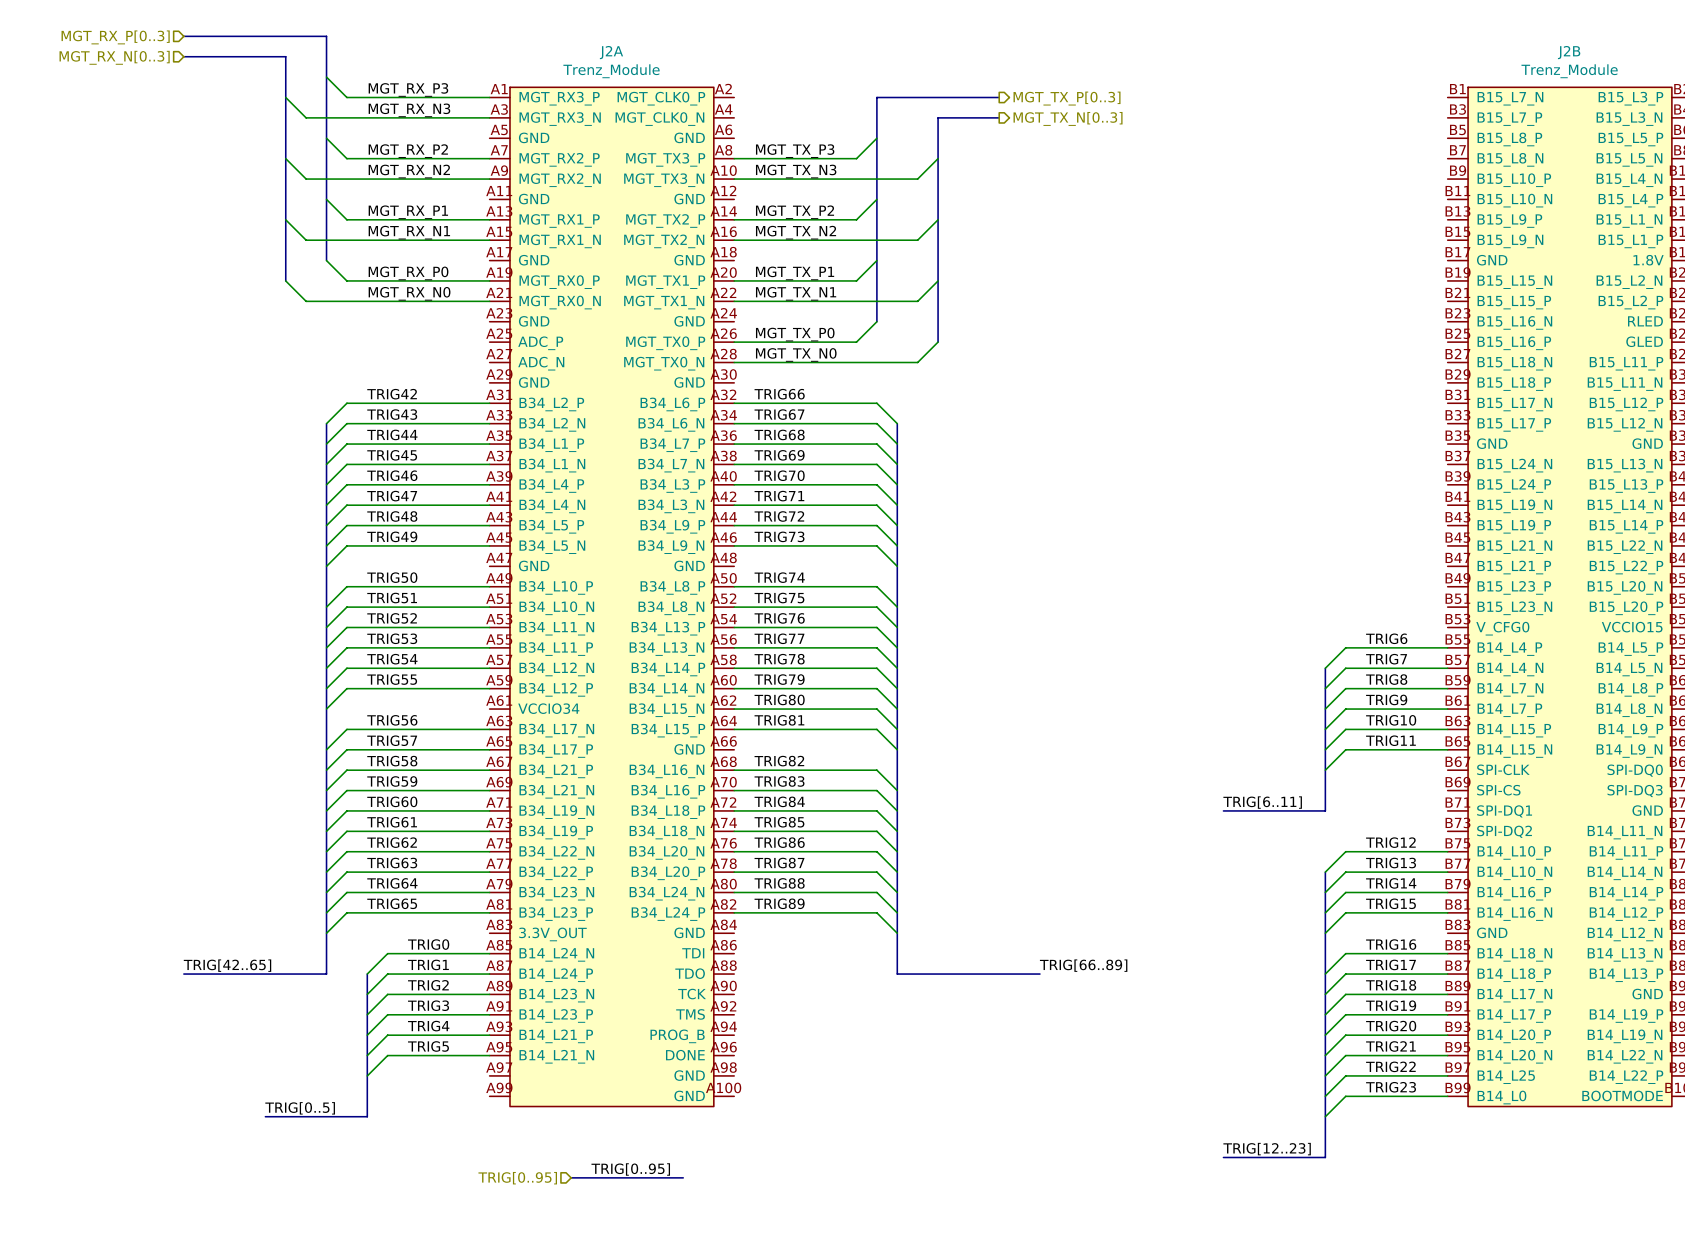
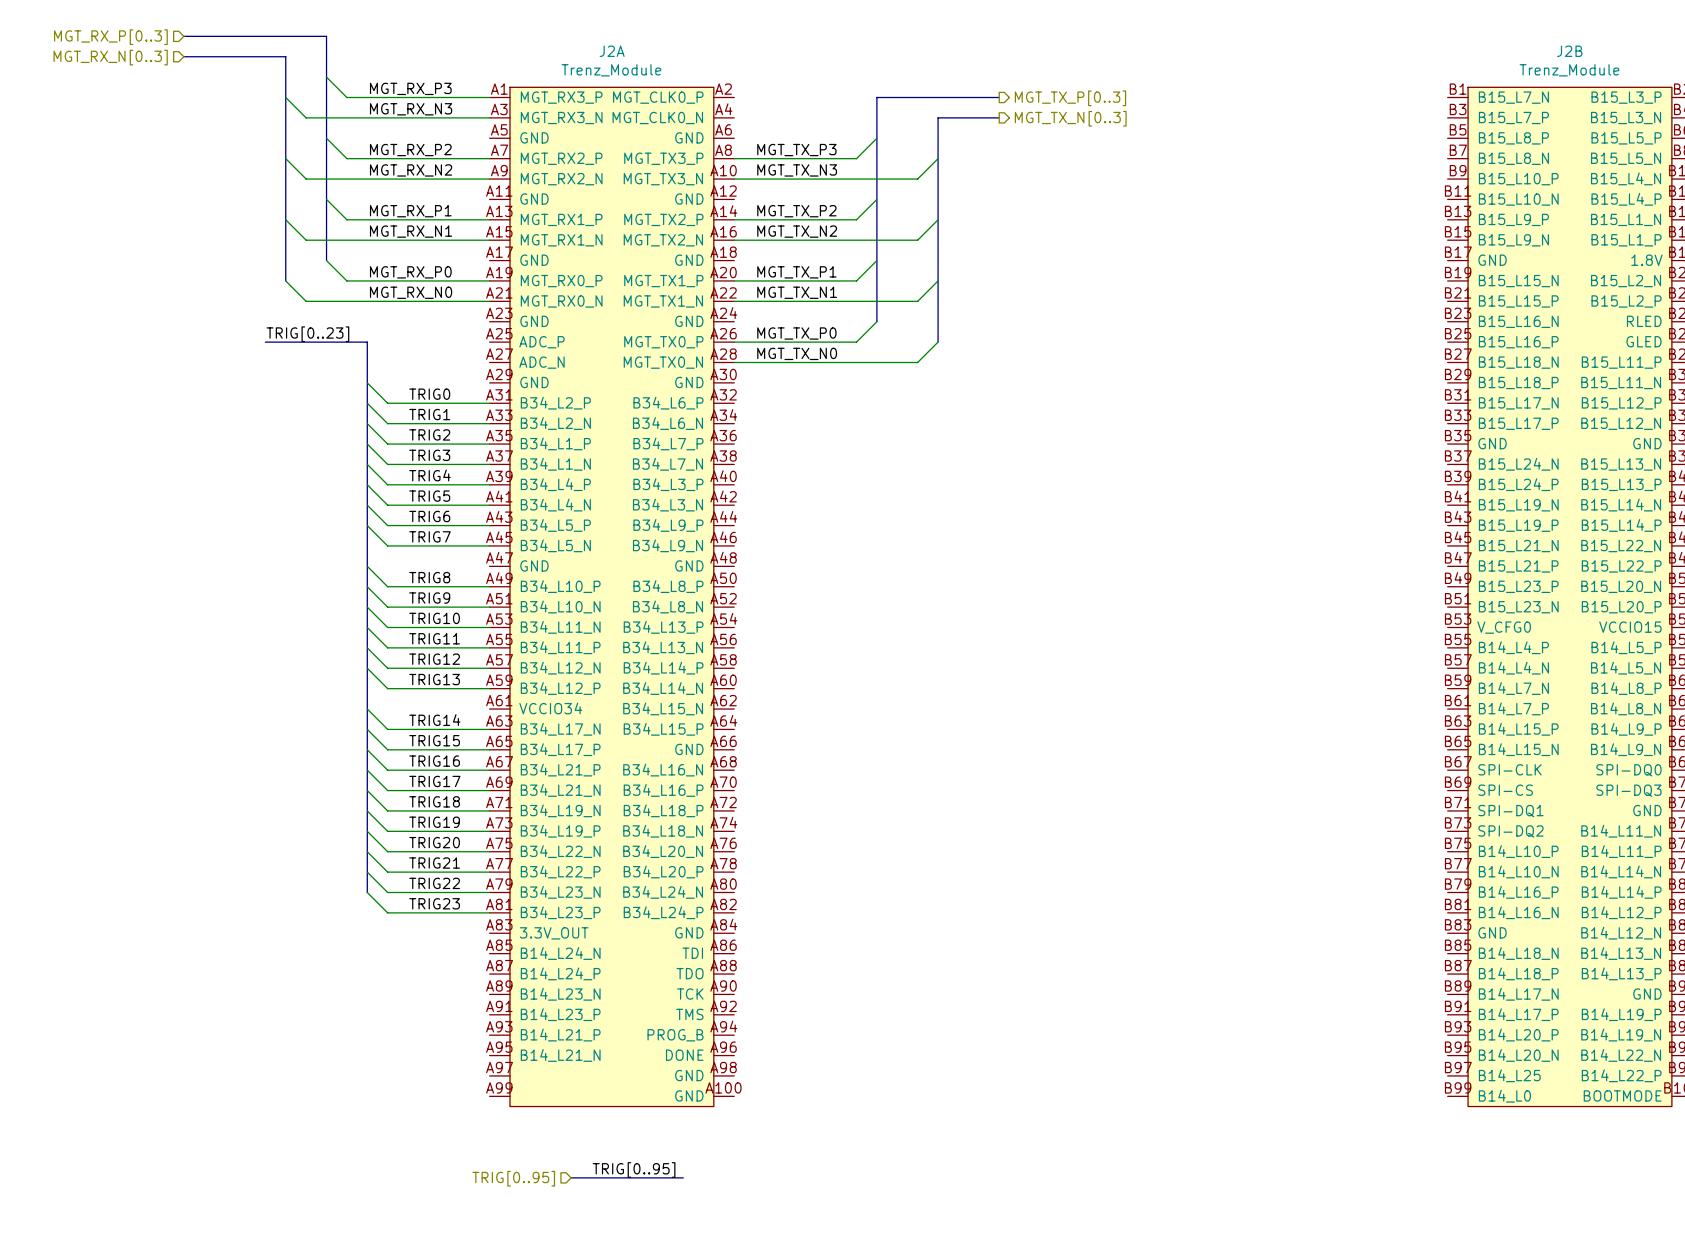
label: none -> TRIG[0..23] (307, 334)
bus: none -> (265, 342) (367, 342) (367, 892)
label: TRIG42 (392, 394) -> none
label: none -> TRIG0 (429, 394)
label: TRIG66 (779, 394) -> none
wire: (387, 403) (346, 403) (326, 423) -> (387, 403) (367, 382)
wire: (734, 403) (876, 403) (897, 423) -> none
label: TRIG43 (392, 414) -> none
label: none -> TRIG1 (429, 414)
label: TRIG67 (779, 414) -> none
bus: (326, 423) (326, 974) (183, 974) -> none
wire: (387, 423) (346, 423) (326, 444) -> (387, 423) (367, 403)
wire: (734, 423) (876, 423) (897, 444) -> none
bus: (897, 423) (897, 974) (1039, 974) -> none
label: TRIG44 (392, 434) -> none
label: none -> TRIG2 (429, 434)
label: TRIG68 (779, 434) -> none
wire: (387, 444) (346, 444) (326, 464) -> (387, 444) (367, 423)
wire: (734, 444) (876, 444) (897, 464) -> none
label: TRIG45 (392, 455) -> none
label: none -> TRIG3 (429, 455)
label: TRIG69 (779, 455) -> none
wire: (387, 464) (346, 464) (326, 484) -> (387, 464) (367, 444)
wire: (734, 464) (876, 464) (897, 484) -> none
label: TRIG46 (392, 475) -> none
label: none -> TRIG4 (429, 475)
label: TRIG70 (779, 475) -> none
wire: (387, 484) (346, 484) (326, 505) -> (387, 484) (367, 464)
wire: (734, 484) (876, 484) (897, 505) -> none
label: TRIG47 (392, 496) -> none
label: none -> TRIG5 (429, 496)
label: TRIG71 (779, 496) -> none
wire: (387, 505) (346, 505) (326, 525) -> (387, 505) (367, 484)
wire: (734, 505) (876, 505) (897, 525) -> none
label: TRIG48 (392, 516) -> none
label: none -> TRIG6 (429, 516)
label: TRIG72 (779, 516) -> none
wire: (387, 525) (346, 525) (326, 545) -> (387, 525) (367, 505)
wire: (734, 525) (876, 525) (897, 545) -> none
label: TRIG49 (392, 536) -> none
label: none -> TRIG7 (429, 536)
label: TRIG73 (779, 536) -> none
wire: (387, 545) (346, 545) (326, 566) -> (387, 545) (367, 525)
wire: (734, 545) (876, 545) (897, 566) -> none
label: TRIG50 (392, 577) -> none
label: none -> TRIG8 (429, 577)
label: TRIG74 (779, 577) -> none
wire: (387, 586) (346, 586) (326, 607) -> (387, 586) (367, 566)
wire: (734, 586) (876, 586) (897, 607) -> none
label: TRIG51 (392, 598) -> none
label: none -> TRIG9 (429, 598)
label: TRIG75 (779, 598) -> none
wire: (387, 607) (346, 607) (326, 627) -> (387, 607) (367, 586)
wire: (734, 607) (876, 607) (897, 627) -> none
label: TRIG52 (392, 618) -> none
label: none -> TRIG10 (434, 618)
label: TRIG76 (779, 618) -> none
wire: (387, 627) (346, 627) (326, 647) -> (387, 627) (367, 607)
wire: (734, 627) (876, 627) (897, 647) -> none
label: TRIG53 (392, 638) -> none
label: none -> TRIG11 (434, 638)
label: TRIG77 (779, 638) -> none
label: TRIG6 (1386, 638) -> none
wire: (387, 647) (346, 647) (326, 668) -> (387, 647) (367, 627)
wire: (734, 647) (876, 647) (897, 668) -> none
wire: (1447, 647) (1345, 647) (1325, 668) -> none
label: TRIG54 (392, 659) -> none
label: none -> TRIG12 (434, 659)
label: TRIG78 (779, 659) -> none
label: TRIG7 (1386, 659) -> none
wire: (387, 668) (346, 668) (326, 688) -> (387, 668) (367, 647)
wire: (734, 668) (876, 668) (897, 688) -> none
bus: (1325, 668) (1325, 810) (1223, 810) -> none
wire: (1447, 668) (1345, 668) (1325, 688) -> none
label: TRIG55 (392, 679) -> none
label: none -> TRIG13 (434, 679)
label: TRIG79 (779, 679) -> none
label: TRIG8 (1386, 679) -> none
wire: (387, 688) (346, 688) (326, 709) -> (387, 688) (367, 668)
wire: (734, 688) (876, 688) (897, 709) -> none
wire: (1447, 688) (1345, 688) (1325, 709) -> none
label: TRIG80 (779, 699) -> none
label: TRIG9 (1386, 699) -> none
wire: (734, 709) (876, 709) (897, 729) -> none
wire: (1447, 709) (1345, 709) (1325, 729) -> none
label: TRIG56 (392, 720) -> none
label: none -> TRIG14 (434, 720)
label: TRIG81 (779, 720) -> none
label: TRIG10 (1391, 720) -> none
wire: (387, 729) (346, 729) (326, 749) -> (387, 729) (367, 709)
wire: (734, 729) (876, 729) (897, 749) -> none
wire: (1447, 729) (1345, 729) (1325, 749) -> none
label: TRIG57 (392, 740) -> none
label: none -> TRIG15 (434, 740)
label: TRIG11 (1390, 740) -> none
wire: (387, 749) (346, 749) (326, 770) -> (387, 749) (367, 729)
wire: (1447, 749) (1345, 749) (1325, 770) -> none
label: TRIG58 (392, 761) -> none
label: none -> TRIG16 (434, 761)
label: TRIG82 (779, 761) -> none
wire: (387, 770) (346, 770) (326, 790) -> (387, 770) (367, 749)
wire: (734, 770) (876, 770) (897, 790) -> none
label: TRIG59 (392, 781) -> none
label: none -> TRIG17 (434, 781)
label: TRIG83 (779, 781) -> none
wire: (387, 790) (346, 790) (326, 810) -> (387, 790) (367, 770)
wire: (734, 790) (876, 790) (897, 810) -> none
label: TRIG60 (392, 801) -> none
label: none -> TRIG18 (434, 801)
label: TRIG84 (779, 801) -> none
label: TRIG[6..11] (1262, 802) -> none
wire: (387, 810) (346, 810) (326, 831) -> (387, 810) (367, 790)
wire: (734, 810) (876, 810) (897, 831) -> none
label: TRIG61 (392, 822) -> none
label: none -> TRIG19 (434, 822)
label: TRIG85 (779, 822) -> none
wire: (387, 831) (346, 831) (326, 851) -> (387, 831) (367, 810)
wire: (734, 831) (876, 831) (897, 851) -> none
label: TRIG62 (392, 842) -> none
label: none -> TRIG20 (434, 842)
label: TRIG86 (779, 842) -> none
label: TRIG12 (1390, 842) -> none
wire: (387, 851) (346, 851) (326, 872) -> (387, 851) (367, 831)
wire: (734, 851) (876, 851) (897, 872) -> none
wire: (1447, 851) (1345, 851) (1325, 872) -> none
label: TRIG63 (392, 863) -> none
label: none -> TRIG21 (434, 863)
label: TRIG87 (779, 863) -> none
label: TRIG13 (1391, 863) -> none
wire: (387, 872) (346, 872) (326, 892) -> (387, 872) (367, 851)
wire: (734, 872) (876, 872) (897, 892) -> none
bus: (1325, 872) (1325, 1157) (1223, 1157) -> none
wire: (1447, 872) (1345, 872) (1325, 892) -> none
label: TRIG64 (392, 883) -> none
label: none -> TRIG22 (434, 883)
label: TRIG88 (779, 883) -> none
label: TRIG14 (1391, 883) -> none
wire: (387, 892) (346, 892) (326, 912) -> (387, 892) (367, 872)
wire: (734, 892) (876, 892) (897, 912) -> none
wire: (1447, 892) (1345, 892) (1325, 912) -> none
label: TRIG65 (392, 903) -> none
label: none -> TRIG23 (434, 903)
label: TRIG89 (779, 903) -> none
label: TRIG15 (1390, 903) -> none
wire: (387, 912) (346, 912) (326, 933) -> (387, 912) (367, 892)
wire: (734, 912) (876, 912) (897, 933) -> none
wire: (1447, 912) (1345, 912) (1325, 933) -> none
label: TRIG0 (428, 944) -> none
label: TRIG16 (1391, 944) -> none
wire: (489, 953) (387, 953) (367, 974) -> none
wire: (1447, 953) (1345, 953) (1325, 974) -> none
label: TRIG1 (428, 964) -> none
label: TRIG17 (1391, 964) -> none
label: TRIG[42..65] (227, 965) -> none
label: TRIG[66..89] (1083, 965) -> none
bus: (367, 974) (367, 1116) (265, 1116) -> none
wire: (489, 974) (387, 974) (367, 994) -> none
wire: (1447, 974) (1345, 974) (1325, 994) -> none
label: TRIG2 (428, 985) -> none
label: TRIG18 (1391, 985) -> none
wire: (489, 994) (387, 994) (367, 1014) -> none
wire: (1447, 994) (1345, 994) (1325, 1014) -> none
label: TRIG3 (428, 1005) -> none
label: TRIG19 (1391, 1005) -> none
wire: (489, 1014) (387, 1014) (367, 1035) -> none
wire: (1447, 1014) (1345, 1014) (1325, 1035) -> none
label: TRIG4 (428, 1026) -> none
label: TRIG20 (1391, 1026) -> none
wire: (489, 1035) (387, 1035) (367, 1055) -> none
wire: (1447, 1035) (1345, 1035) (1325, 1055) -> none
label: TRIG5 (428, 1046) -> none
label: TRIG21 (1390, 1046) -> none
wire: (489, 1055) (387, 1055) (367, 1075) -> none
wire: (1447, 1055) (1345, 1055) (1325, 1075) -> none
label: TRIG22 (1390, 1066) -> none
wire: (1447, 1075) (1345, 1075) (1325, 1096) -> none
label: TRIG23 (1391, 1087) -> none
wire: (1447, 1096) (1345, 1096) (1325, 1116) -> none
label: TRIG[0..5] (300, 1108) -> none
label: TRIG[12..23] (1267, 1149) -> none

